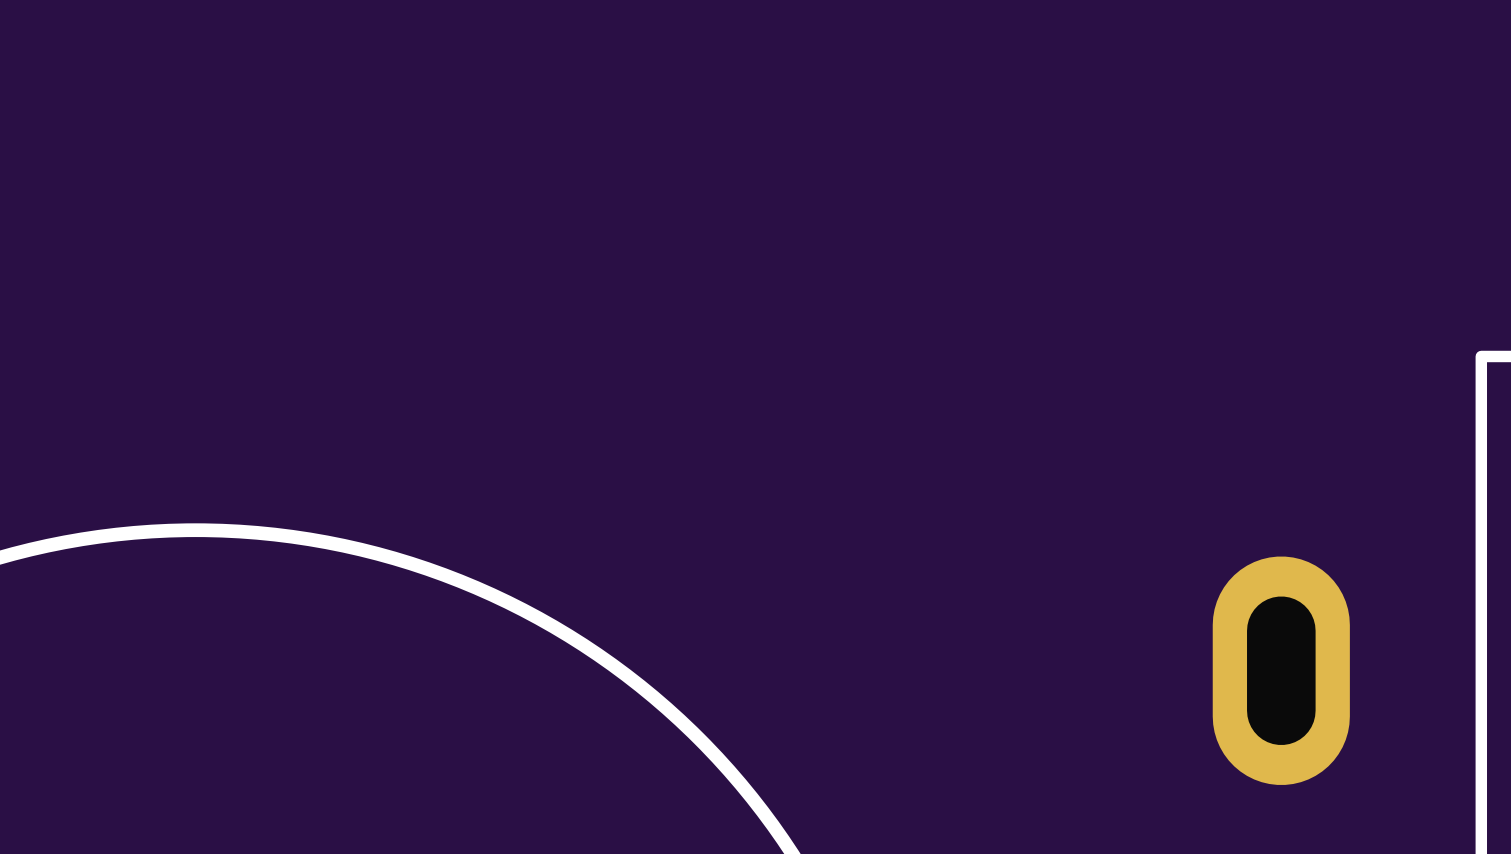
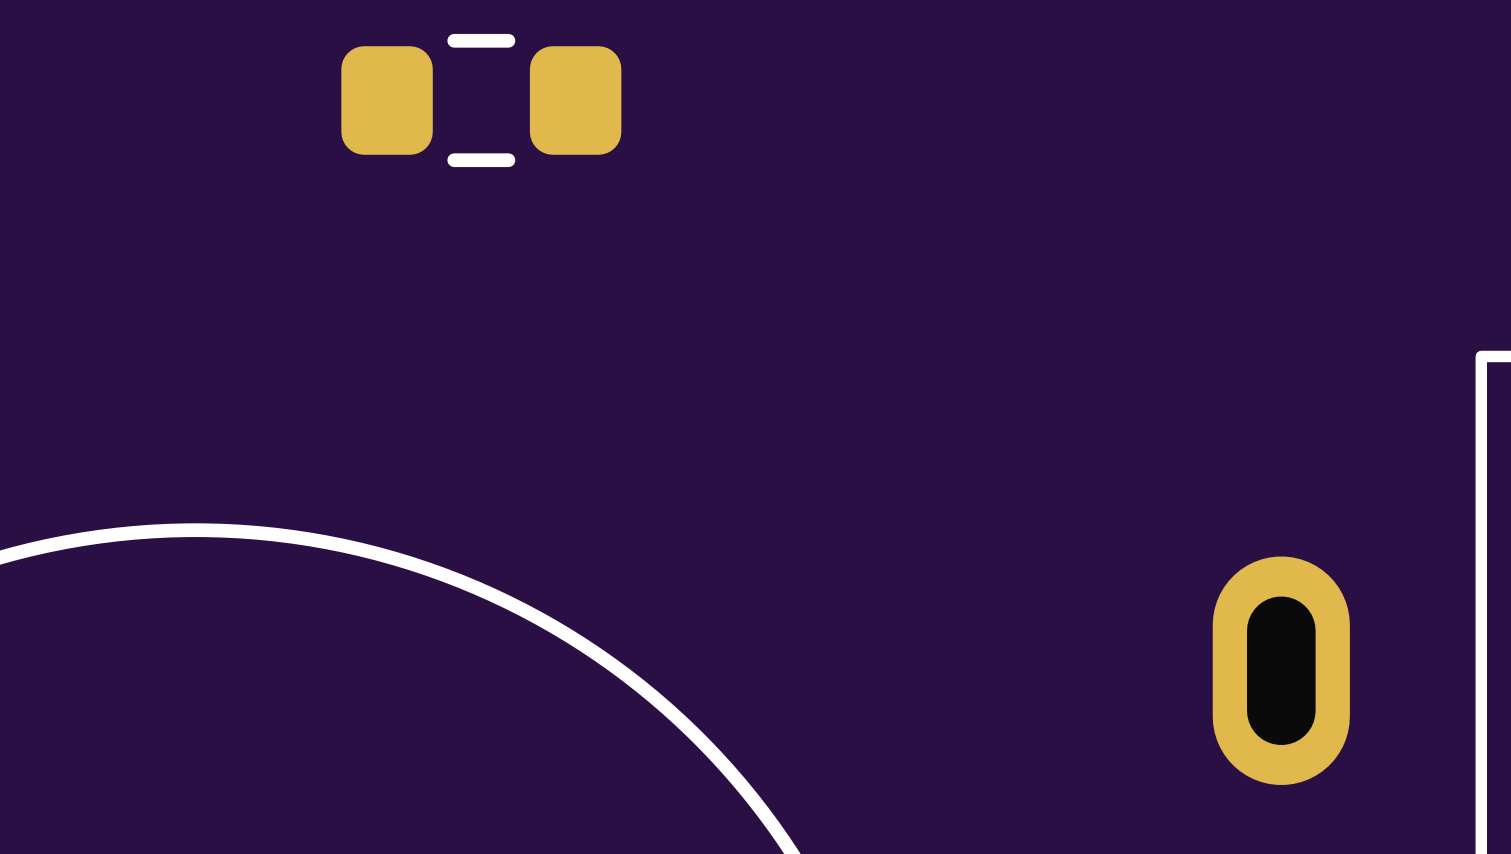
part: none -> (481, 100)

